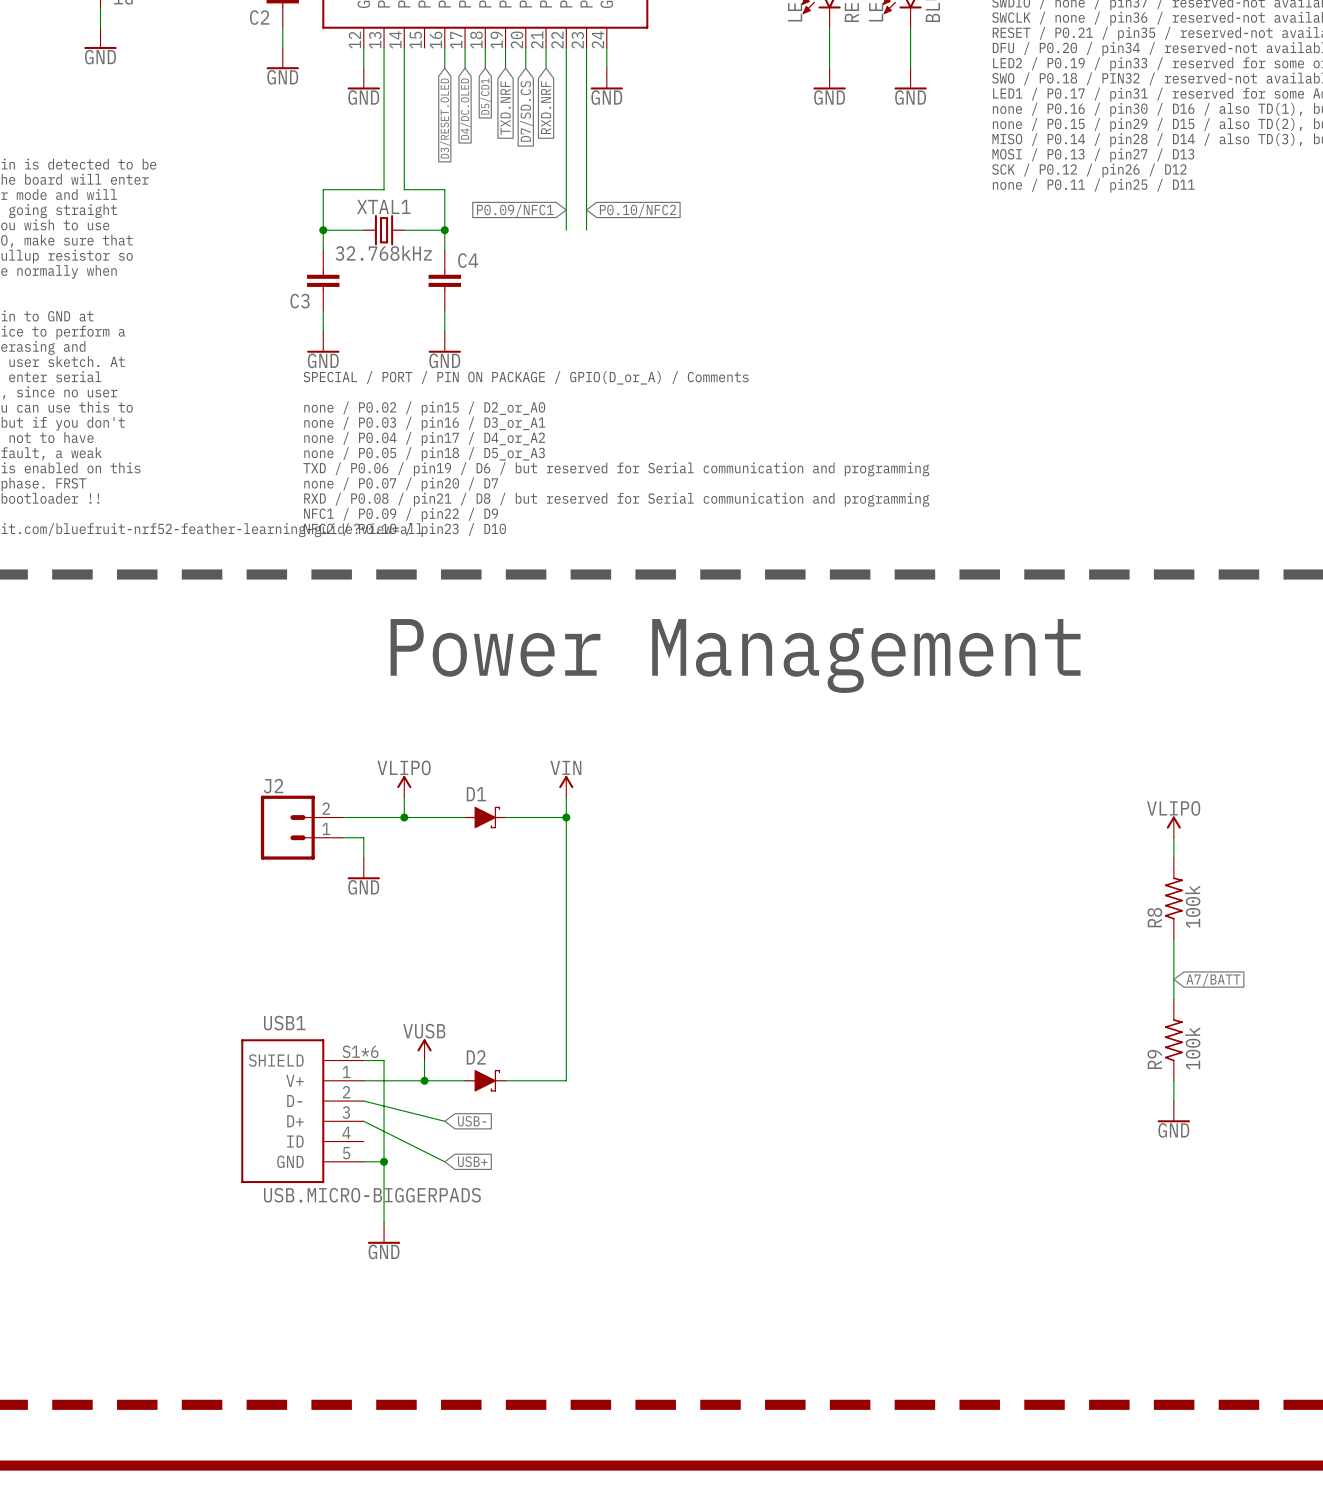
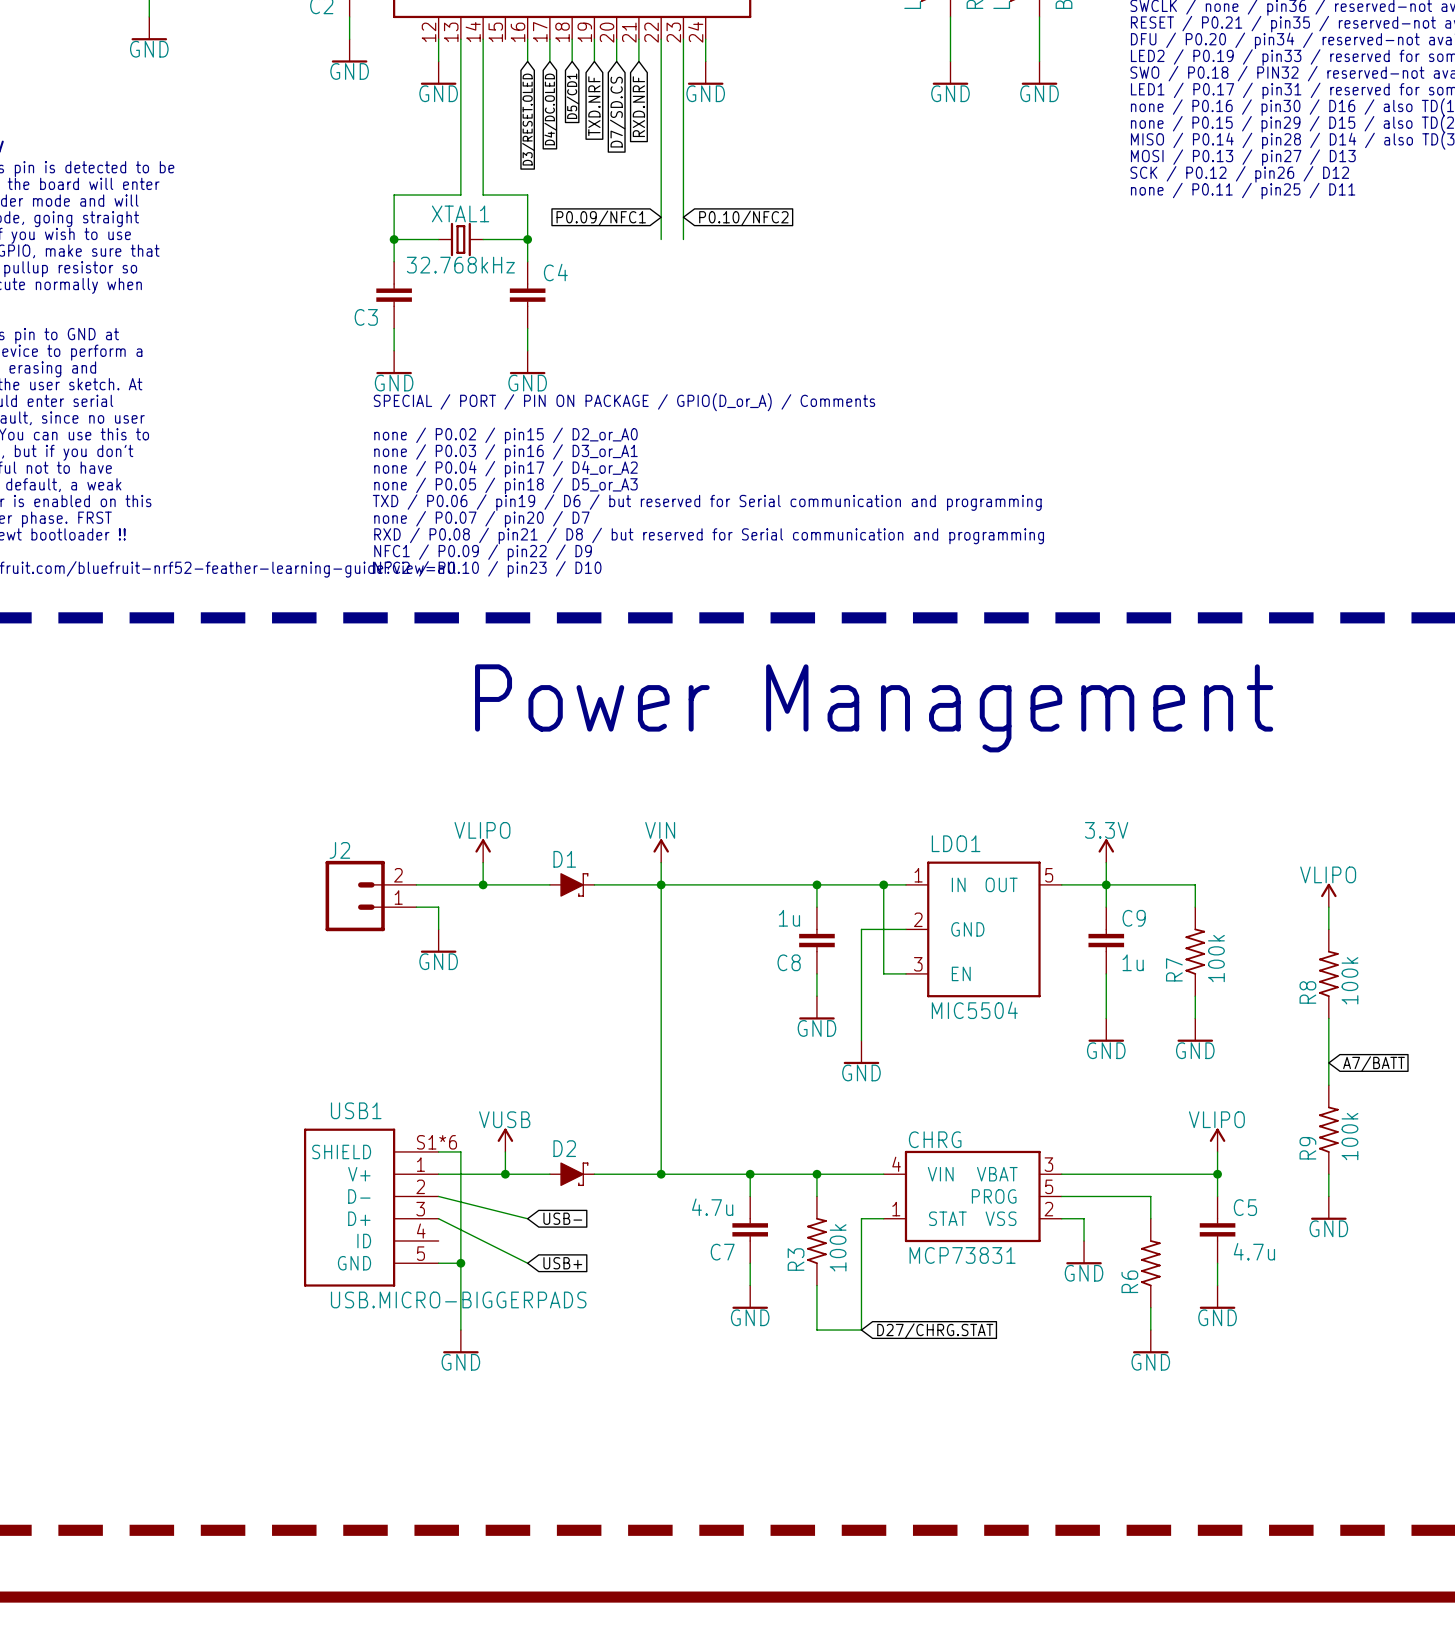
power symbol: none -> 3.3V (1106, 850)
wire: none -> (1106, 862) (1106, 907)
wire: none -> (661, 884) (905, 884)
wire: none -> (816, 884) (816, 907)
junction: none -> (816, 884)
wire: none -> (883, 884) (883, 973) (905, 973)
junction: none -> (883, 884)
wire: none -> (1061, 884) (1195, 884) (1195, 907)
junction: none -> (1106, 884)
wire: none -> (905, 929) (861, 929) (861, 1040)
LDO1: none -> MIC5504 (983, 929)
C8: none -> 1u (816, 940)
C9: none -> 1u (1106, 940)
R7: none -> 100k (1195, 951)
wire: none -> (816, 973) (816, 996)
wire: none -> (1106, 973) (1106, 1018)
wire: none -> (1195, 996) (1195, 1018)
power symbol: none -> GND (816, 1007)
power symbol: none -> GND (1106, 1030)
power symbol: none -> GND (1195, 1030)
power symbol: none -> GND (861, 1052)
power symbol: none -> VLIPO (1217, 1140)
wire: none -> (1217, 1151) (1217, 1196)
wire: none -> (661, 1174) (883, 1174)
junction: none -> (661, 1174)
wire: none -> (750, 1174) (750, 1196)
junction: none -> (750, 1174)
wire: none -> (816, 1174) (816, 1196)
junction: none -> (816, 1174)
wire: none -> (1061, 1174) (1217, 1174)
junction: none -> (1217, 1174)
CHRG: none -> MCP73831 (972, 1196)
wire: none -> (1061, 1196) (1150, 1196) (1150, 1218)
wire: none -> (883, 1218) (861, 1218) (861, 1330) (816, 1330) (816, 1285)
wire: none -> (1061, 1218) (1084, 1218) (1084, 1240)
C7: none -> 4.7u (750, 1229)
C5: none -> 4.7u (1217, 1229)
R3: none -> 100k (816, 1240)
power symbol: none -> GND (1084, 1252)
wire: none -> (750, 1263) (750, 1285)
R6: none -> (1150, 1263)
wire: none -> (1217, 1263) (1217, 1285)
power symbol: none -> GND (750, 1297)
power symbol: none -> GND (1217, 1297)
wire: none -> (1150, 1307) (1150, 1330)
global label: none -> D27/CHRG.STAT (935, 1331)
power symbol: none -> GND (1150, 1341)

